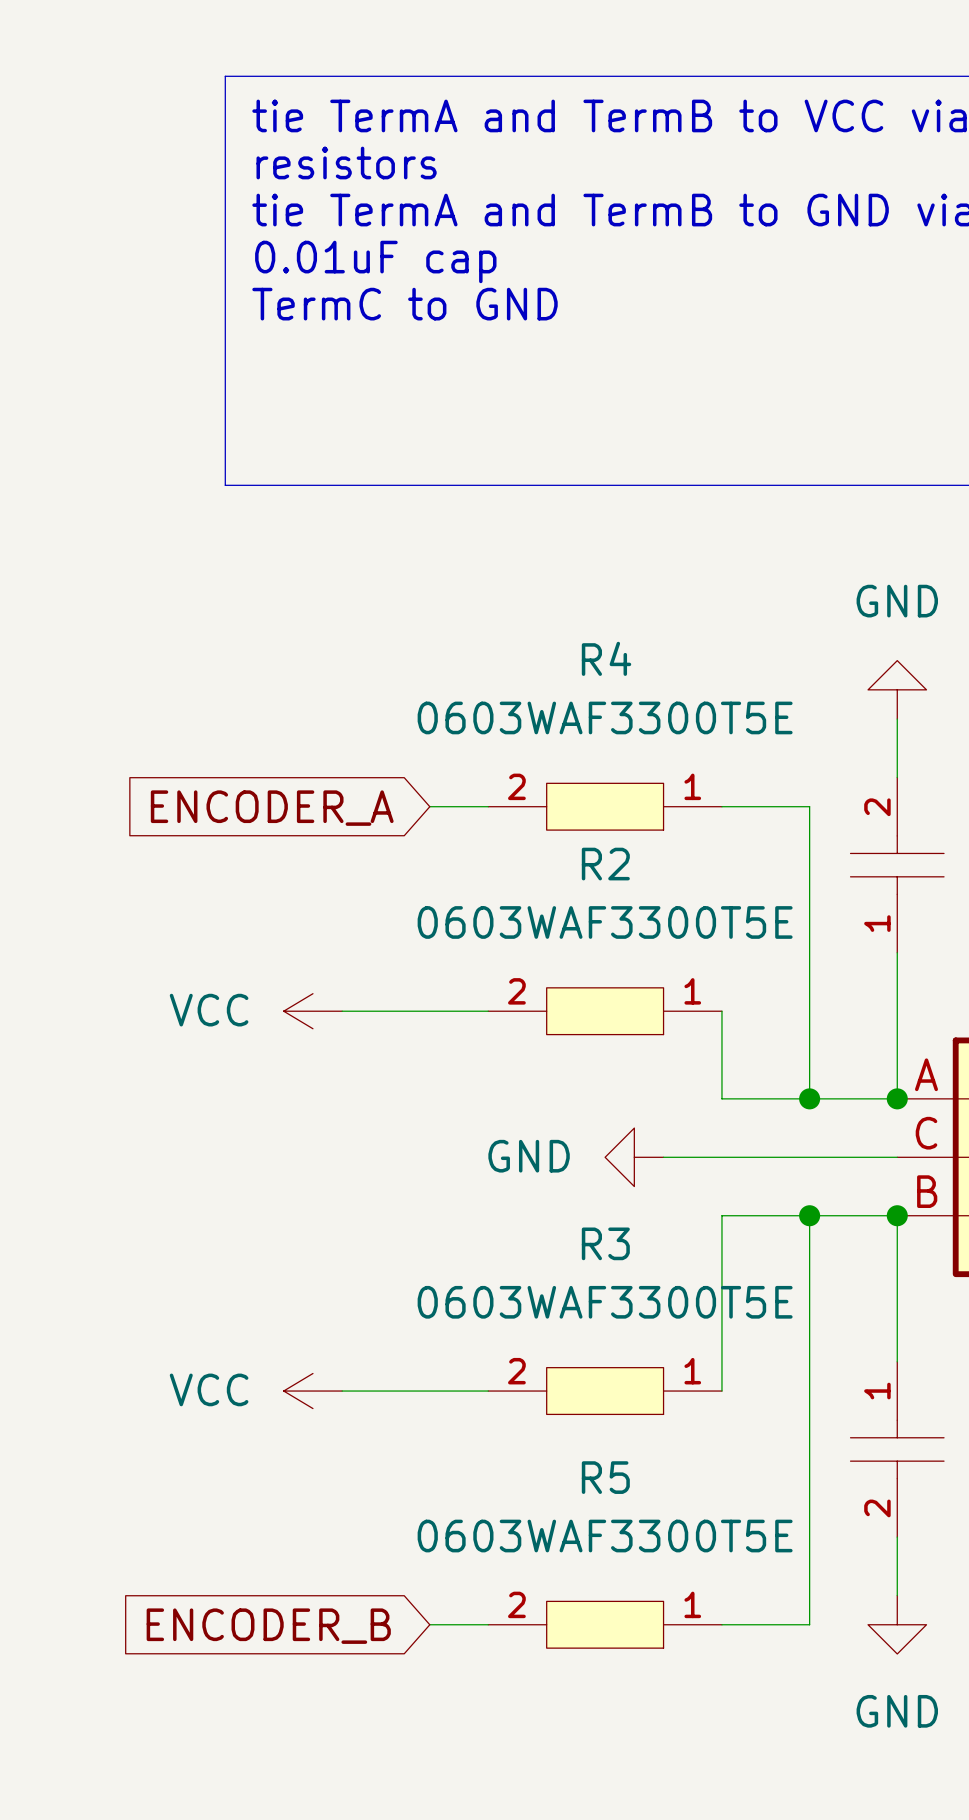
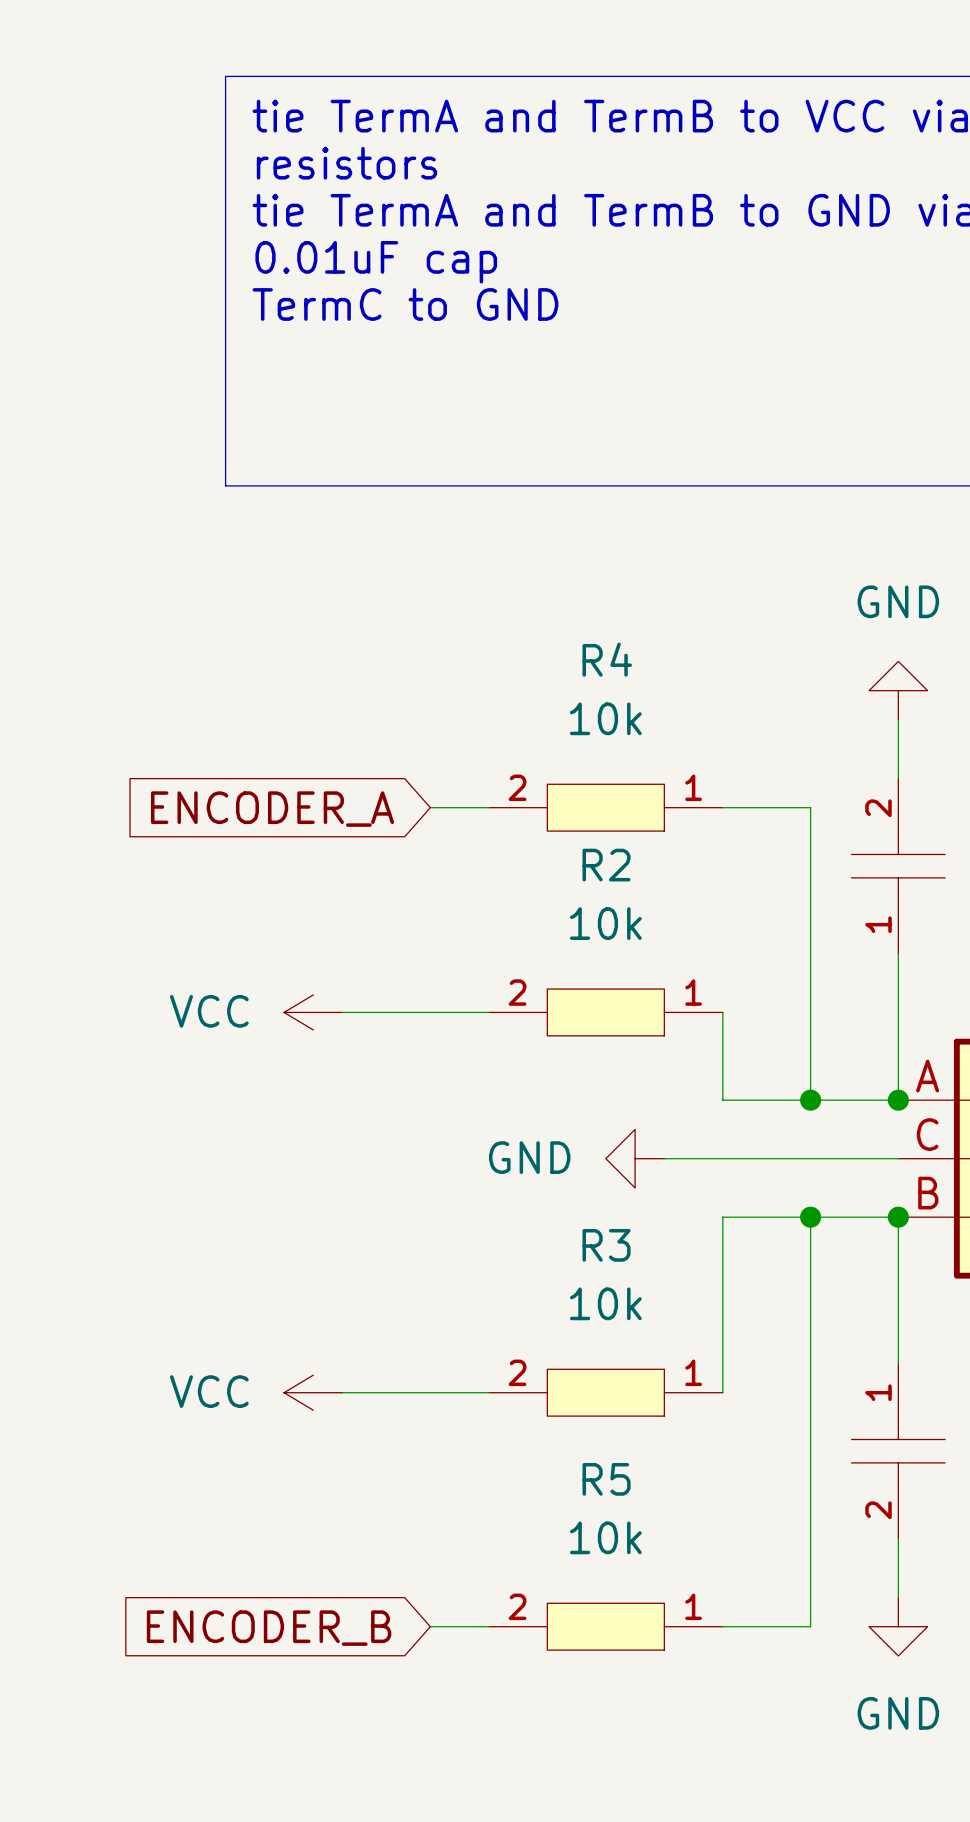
R4 value: 0603WAF3300T5E (605, 717) -> 10k (605, 718)
R2 value: 0603WAF3300T5E (605, 922) -> 10k (605, 923)
R3 value: 0603WAF3300T5E (605, 1302) -> 10k (605, 1303)
R5 value: 0603WAF3300T5E (605, 1536) -> 10k (605, 1537)

